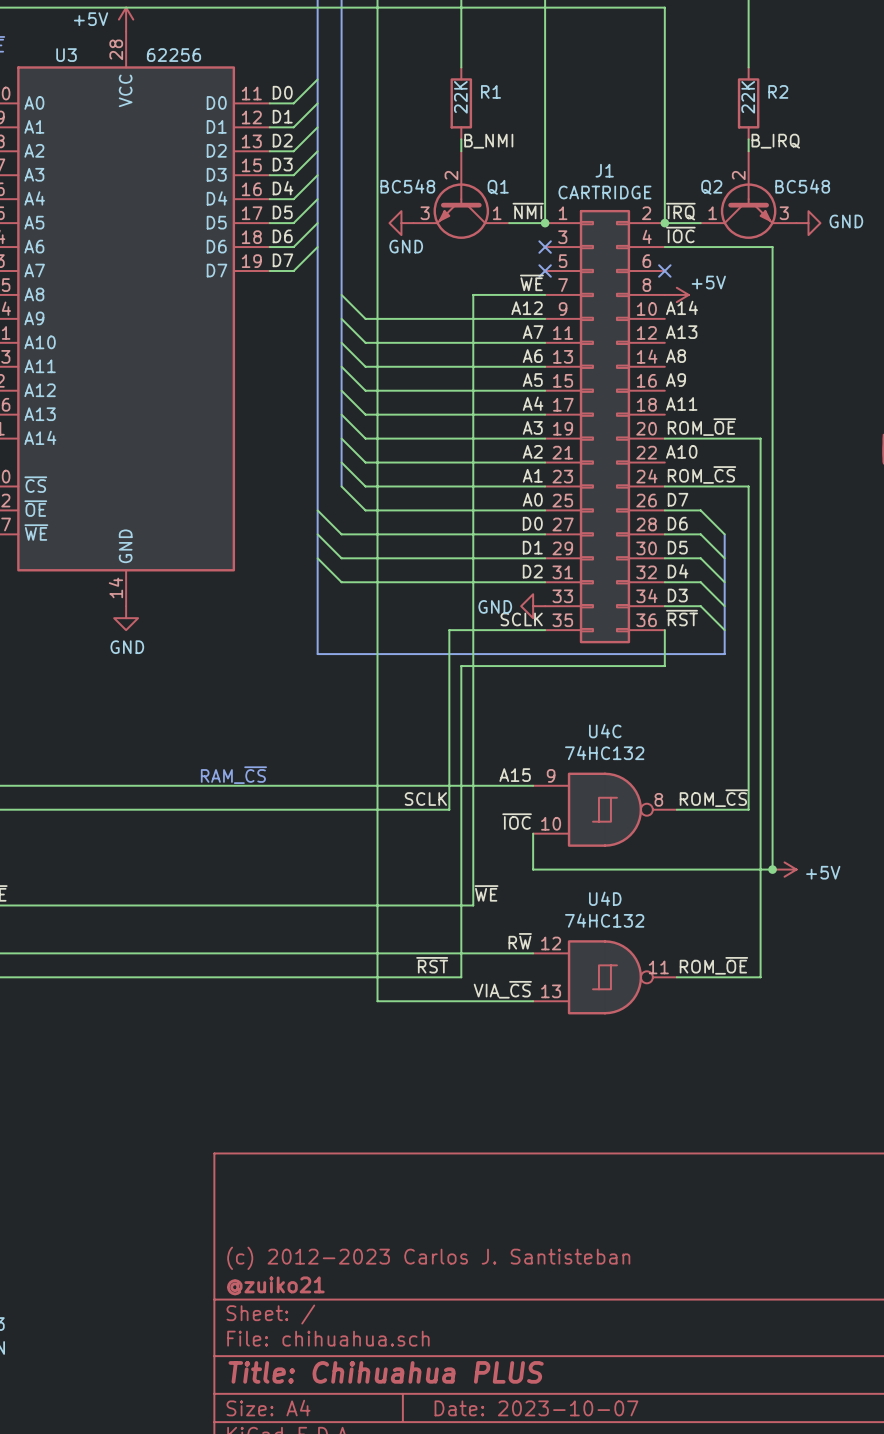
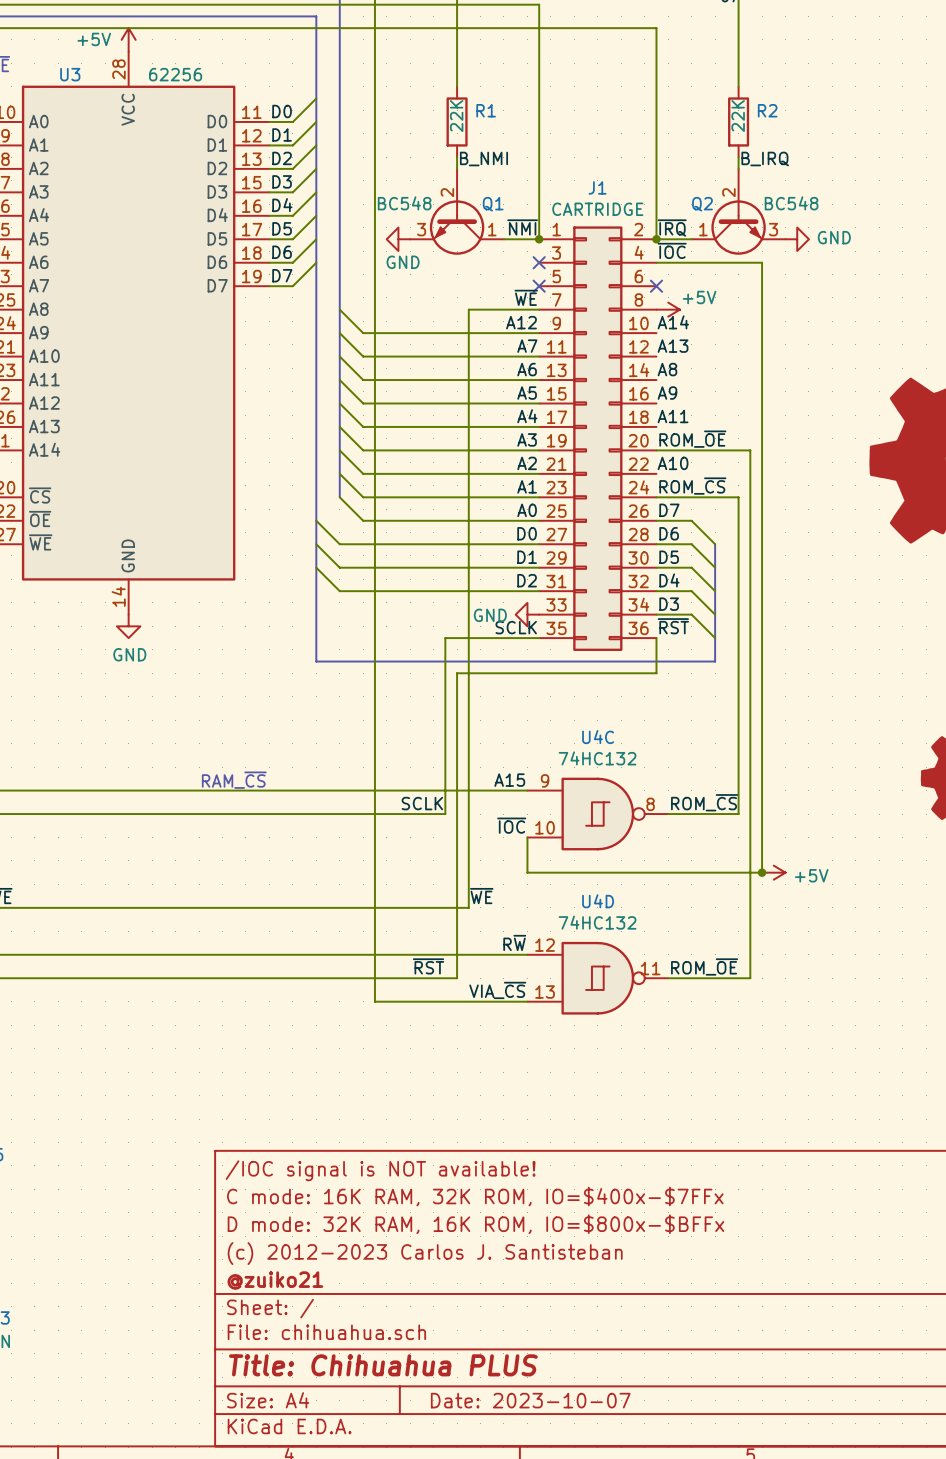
title block: none -> /IOC signal is NOT available! (380, 1170)
title block: none -> C mode: 16K RAM, 32K ROM, IO=$400x-$7FFx (475, 1196)
title block: none -> D mode: 32K RAM, 16K ROM, IO=$800x-$BFFx (475, 1224)

